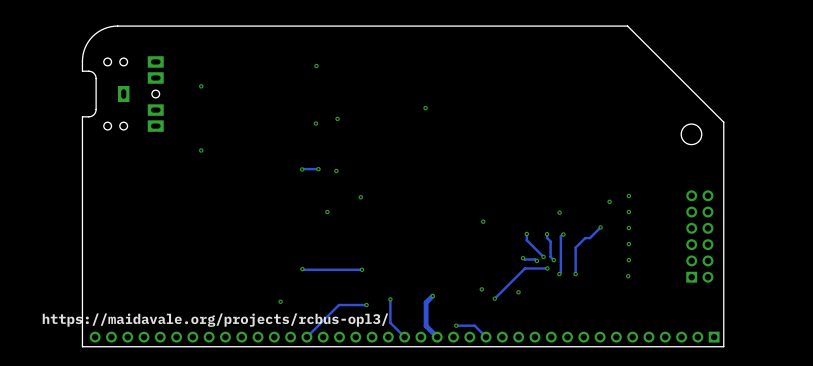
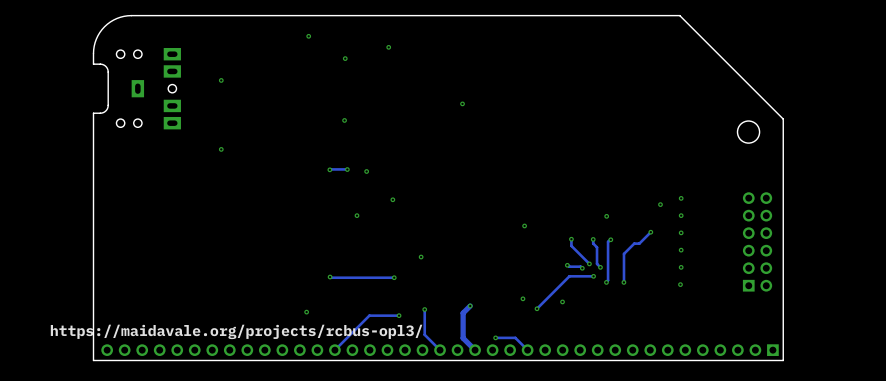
via: none -> (308, 36)
via: none -> (388, 47)
via: (337, 118) -> none
via: none -> (421, 257)

